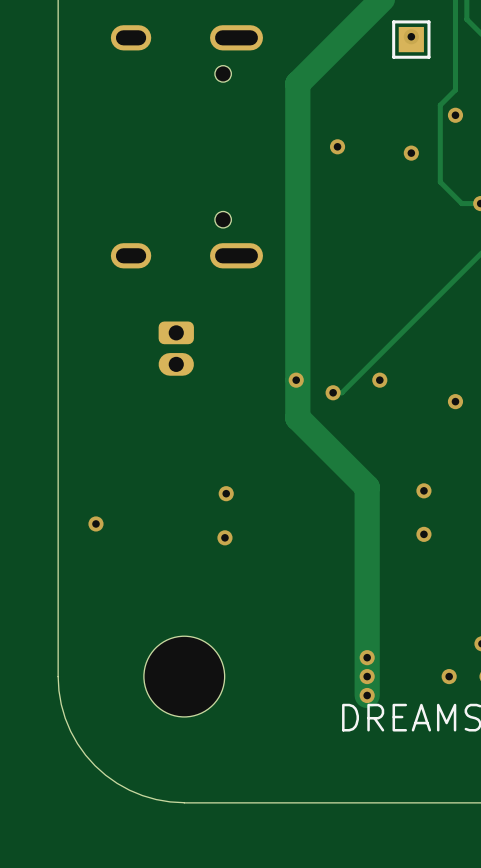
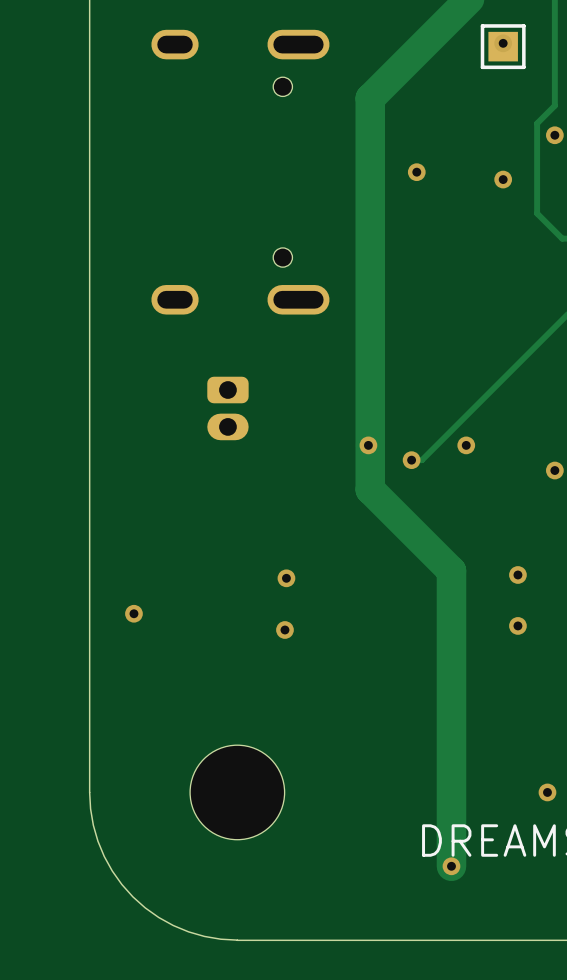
via: (367, 657) -> none
via: (367, 676) -> none
track: none -> (451, 814) (451, 866)
via: (367, 695) -> none
via: none -> (451, 866)

